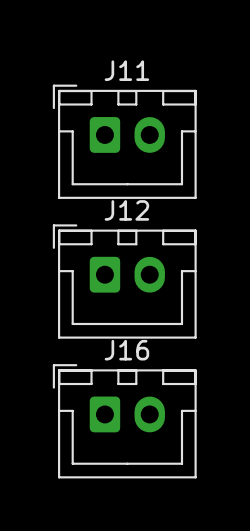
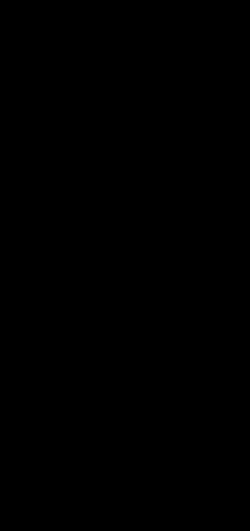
J11: (124, 141) -> none
J12: (124, 281) -> none
J16: (124, 421) -> none

